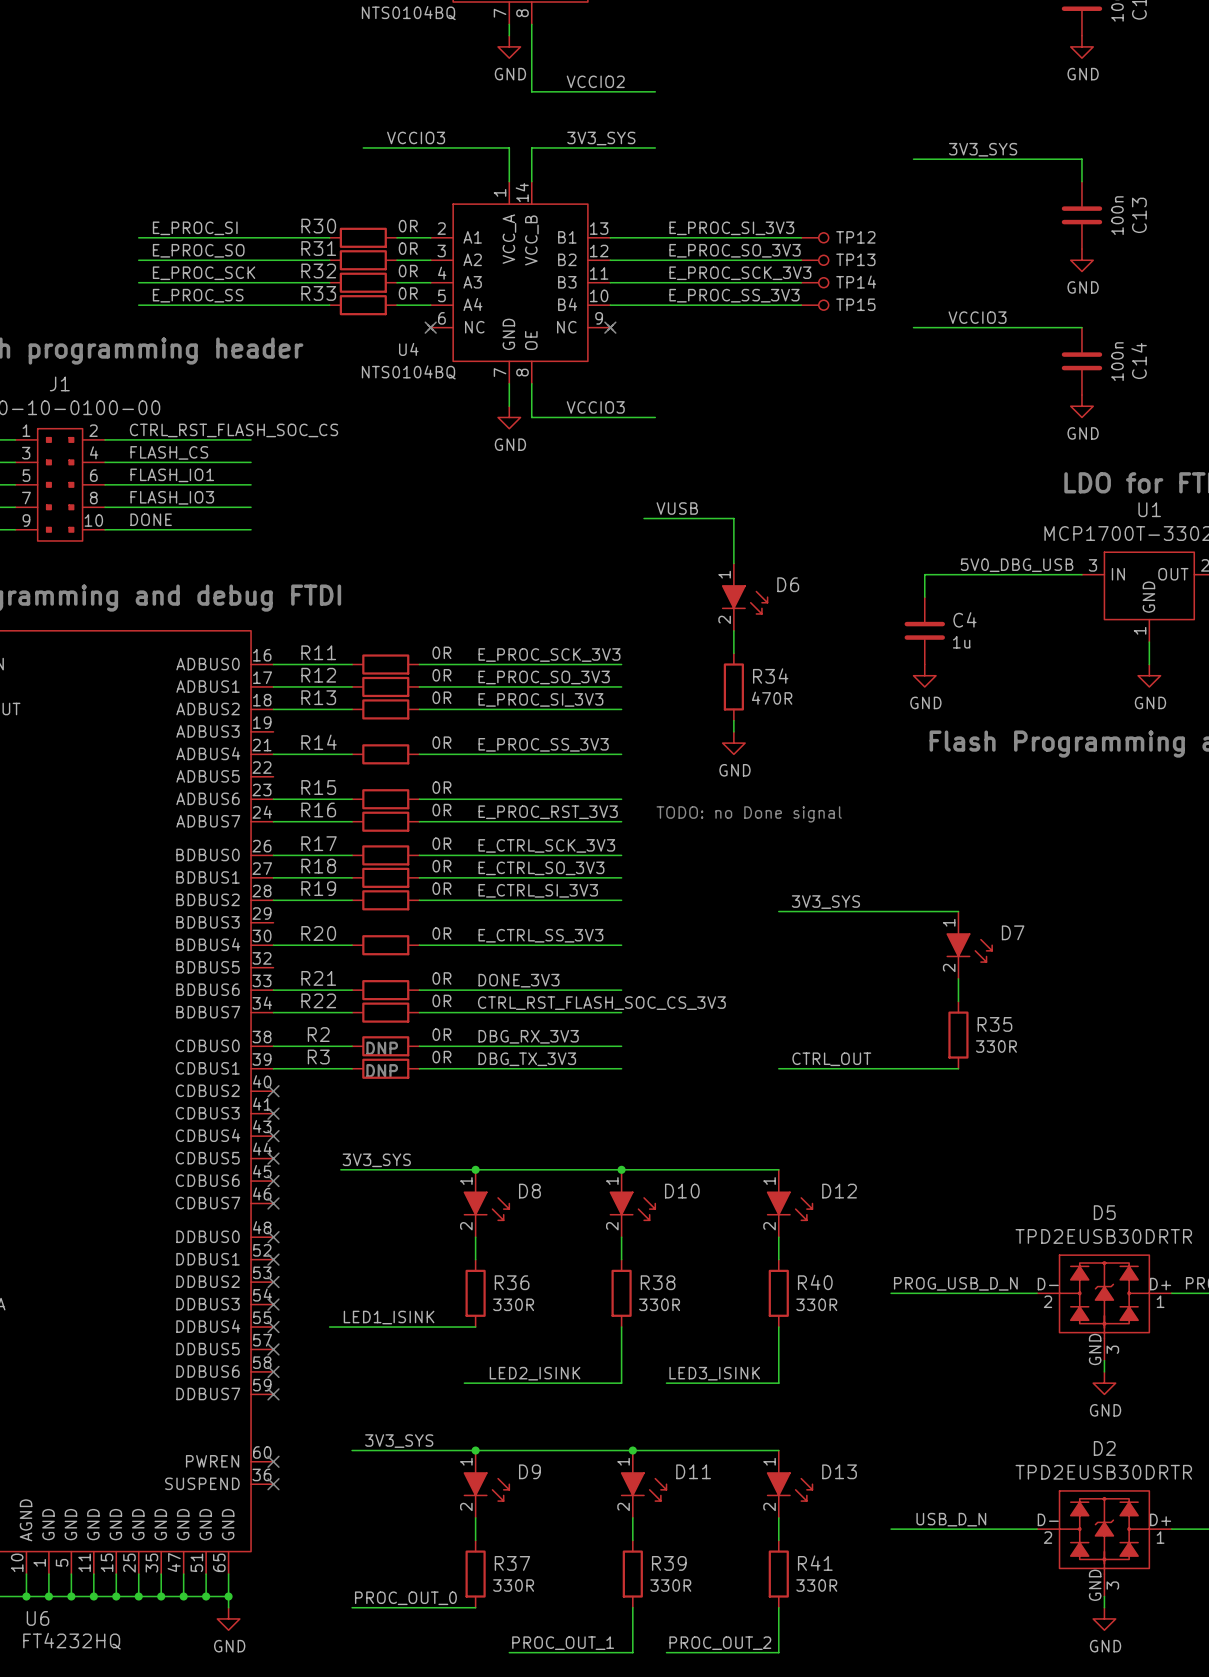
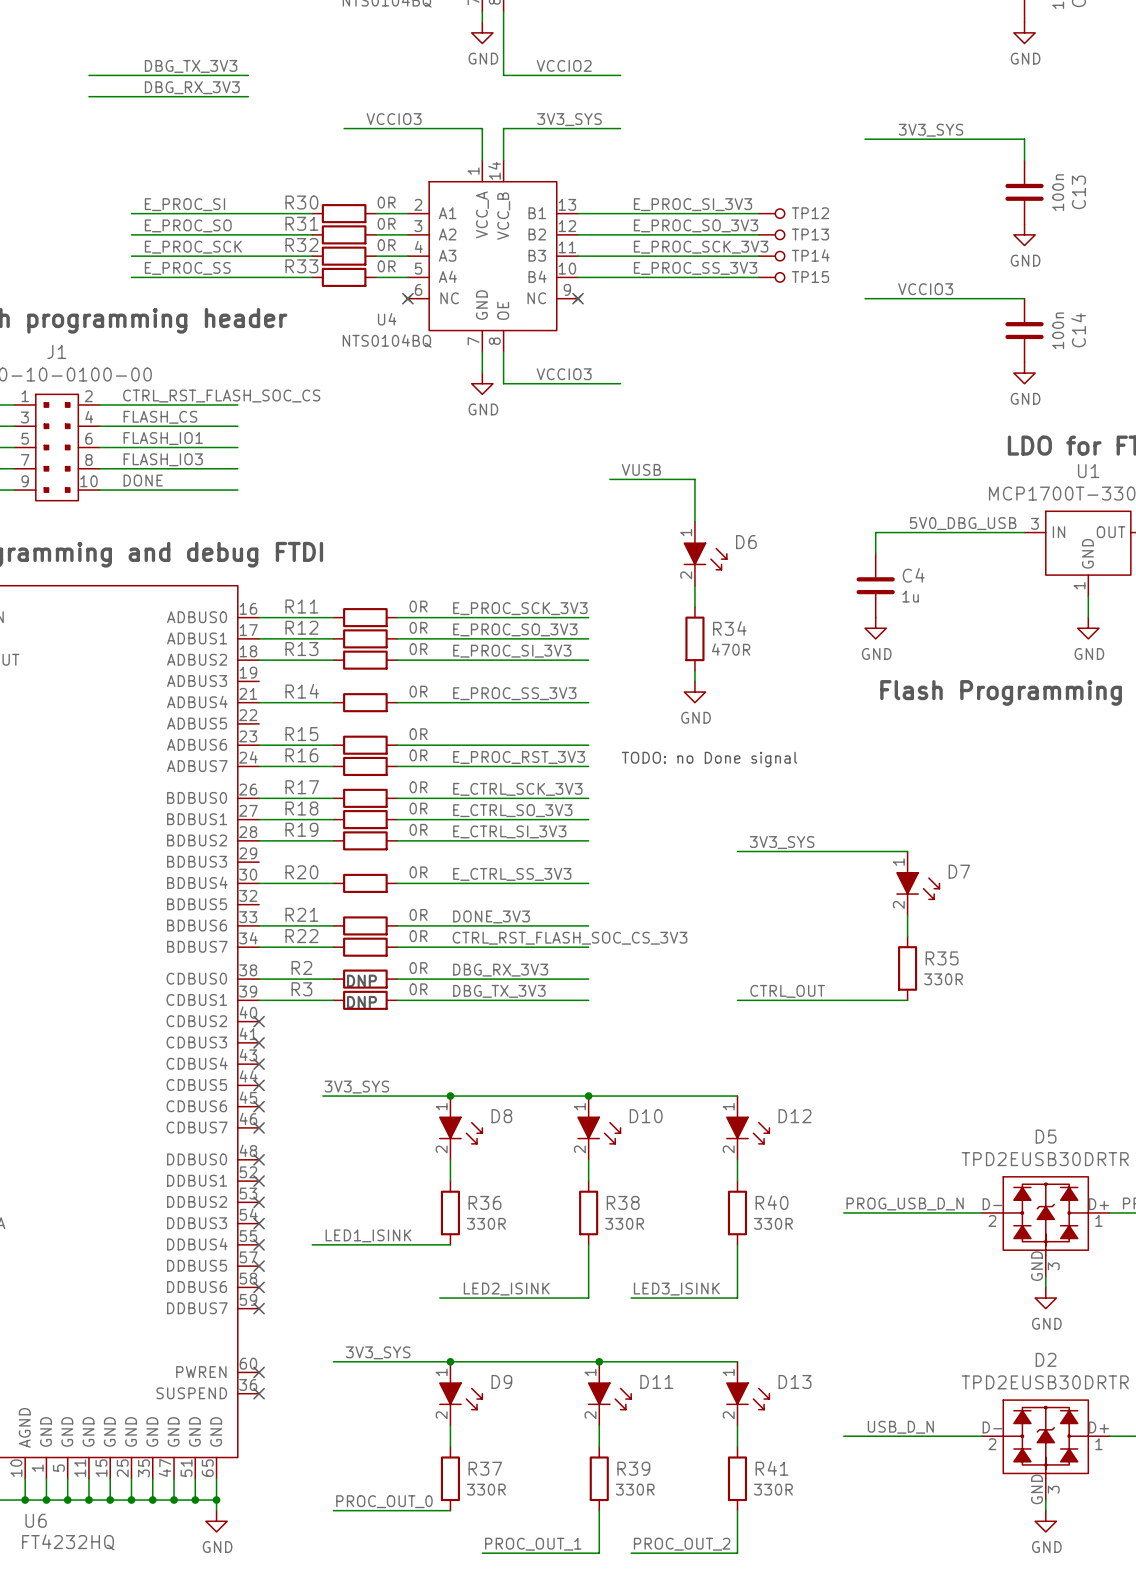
label: none -> DBG_TX_3V3 (191, 66)
wire: none -> (88, 75) (248, 75)
label: none -> DBG_RX_3V3 (192, 87)
wire: none -> (88, 96) (248, 96)

